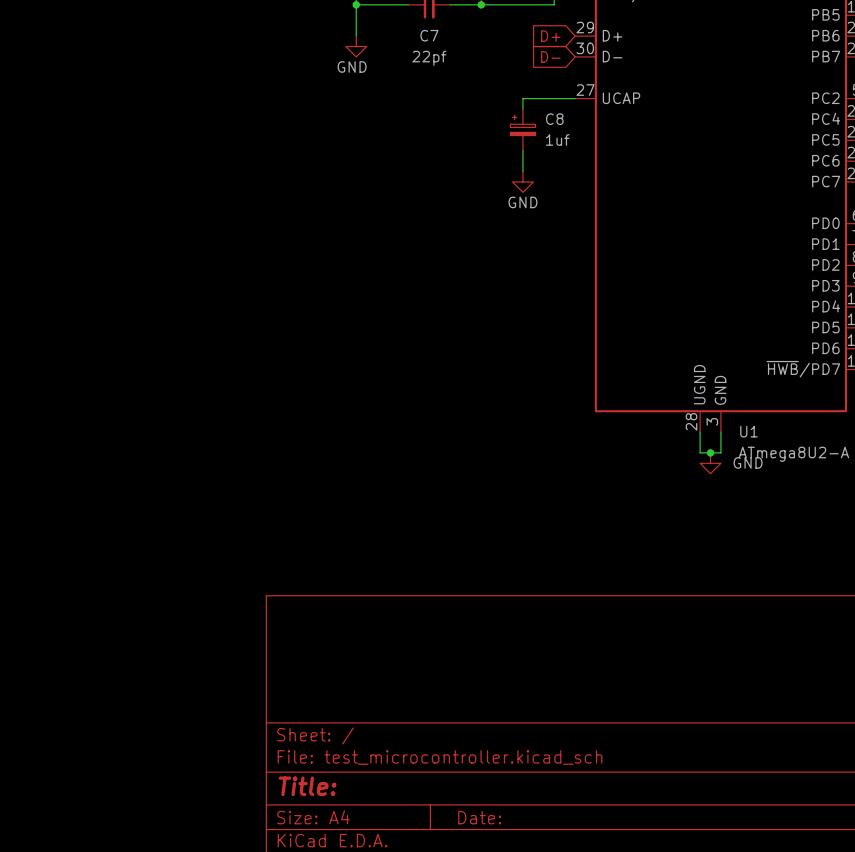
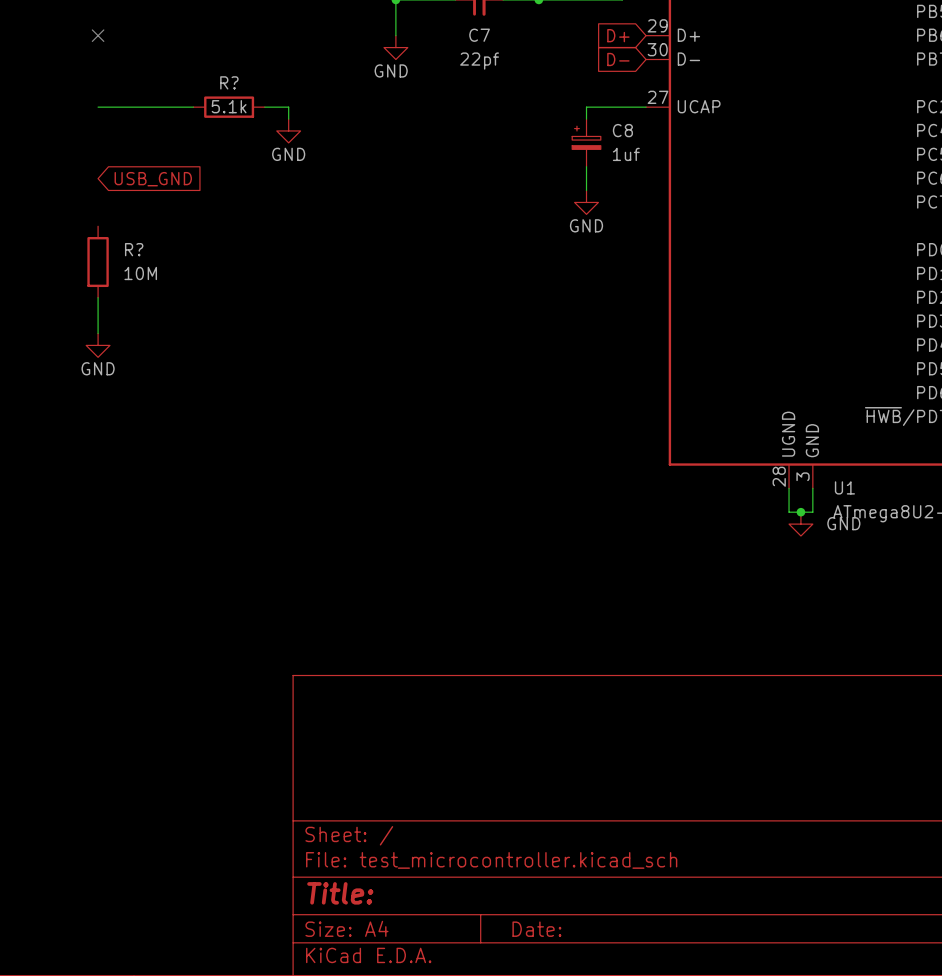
no-connect mark: none -> (98, 35)
wire: none -> (98, 107) (193, 107)
R?: none -> 5.1k (229, 107)
wire: none -> (264, 107) (288, 107) (288, 119)
power symbol: none -> GND (288, 130)
global label: none -> USB_GND (153, 179)
R?: none -> 10M (98, 262)
wire: none -> (98, 297) (98, 333)
power symbol: none -> GND (98, 345)

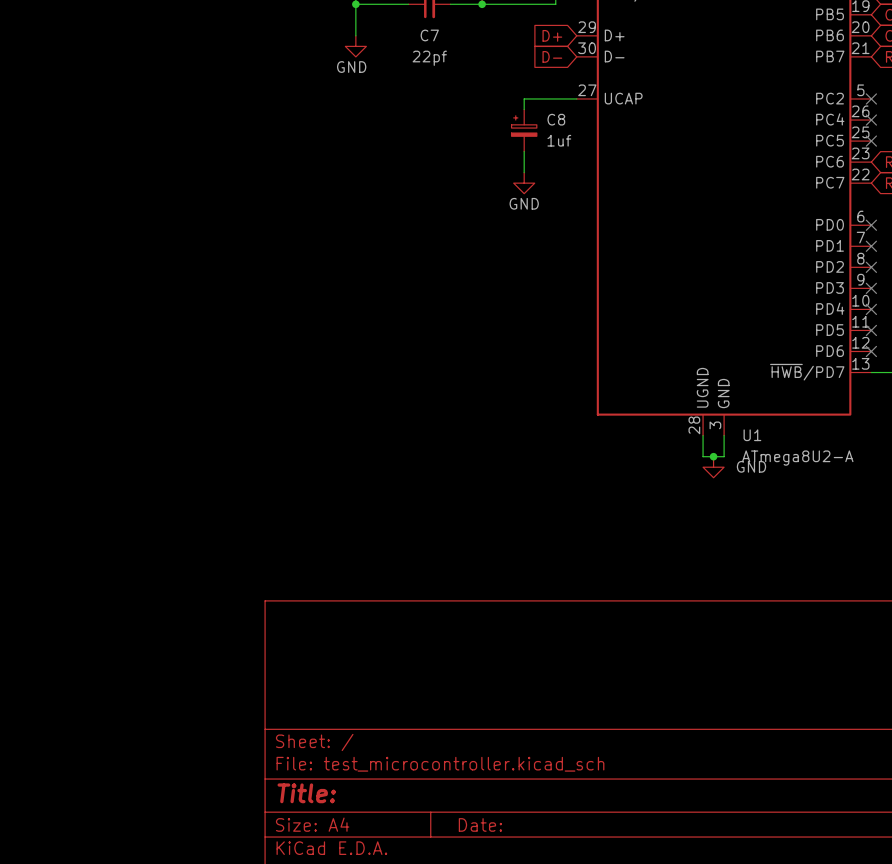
no-connect mark: (98, 35) -> none
wire: (98, 107) (193, 107) -> none
R?: 5.1k (229, 107) -> none
wire: (264, 107) (288, 107) (288, 119) -> none
power symbol: GND (288, 130) -> none
global label: USB_GND (153, 179) -> none
R?: 10M (98, 262) -> none
wire: (98, 297) (98, 333) -> none
power symbol: GND (98, 345) -> none

